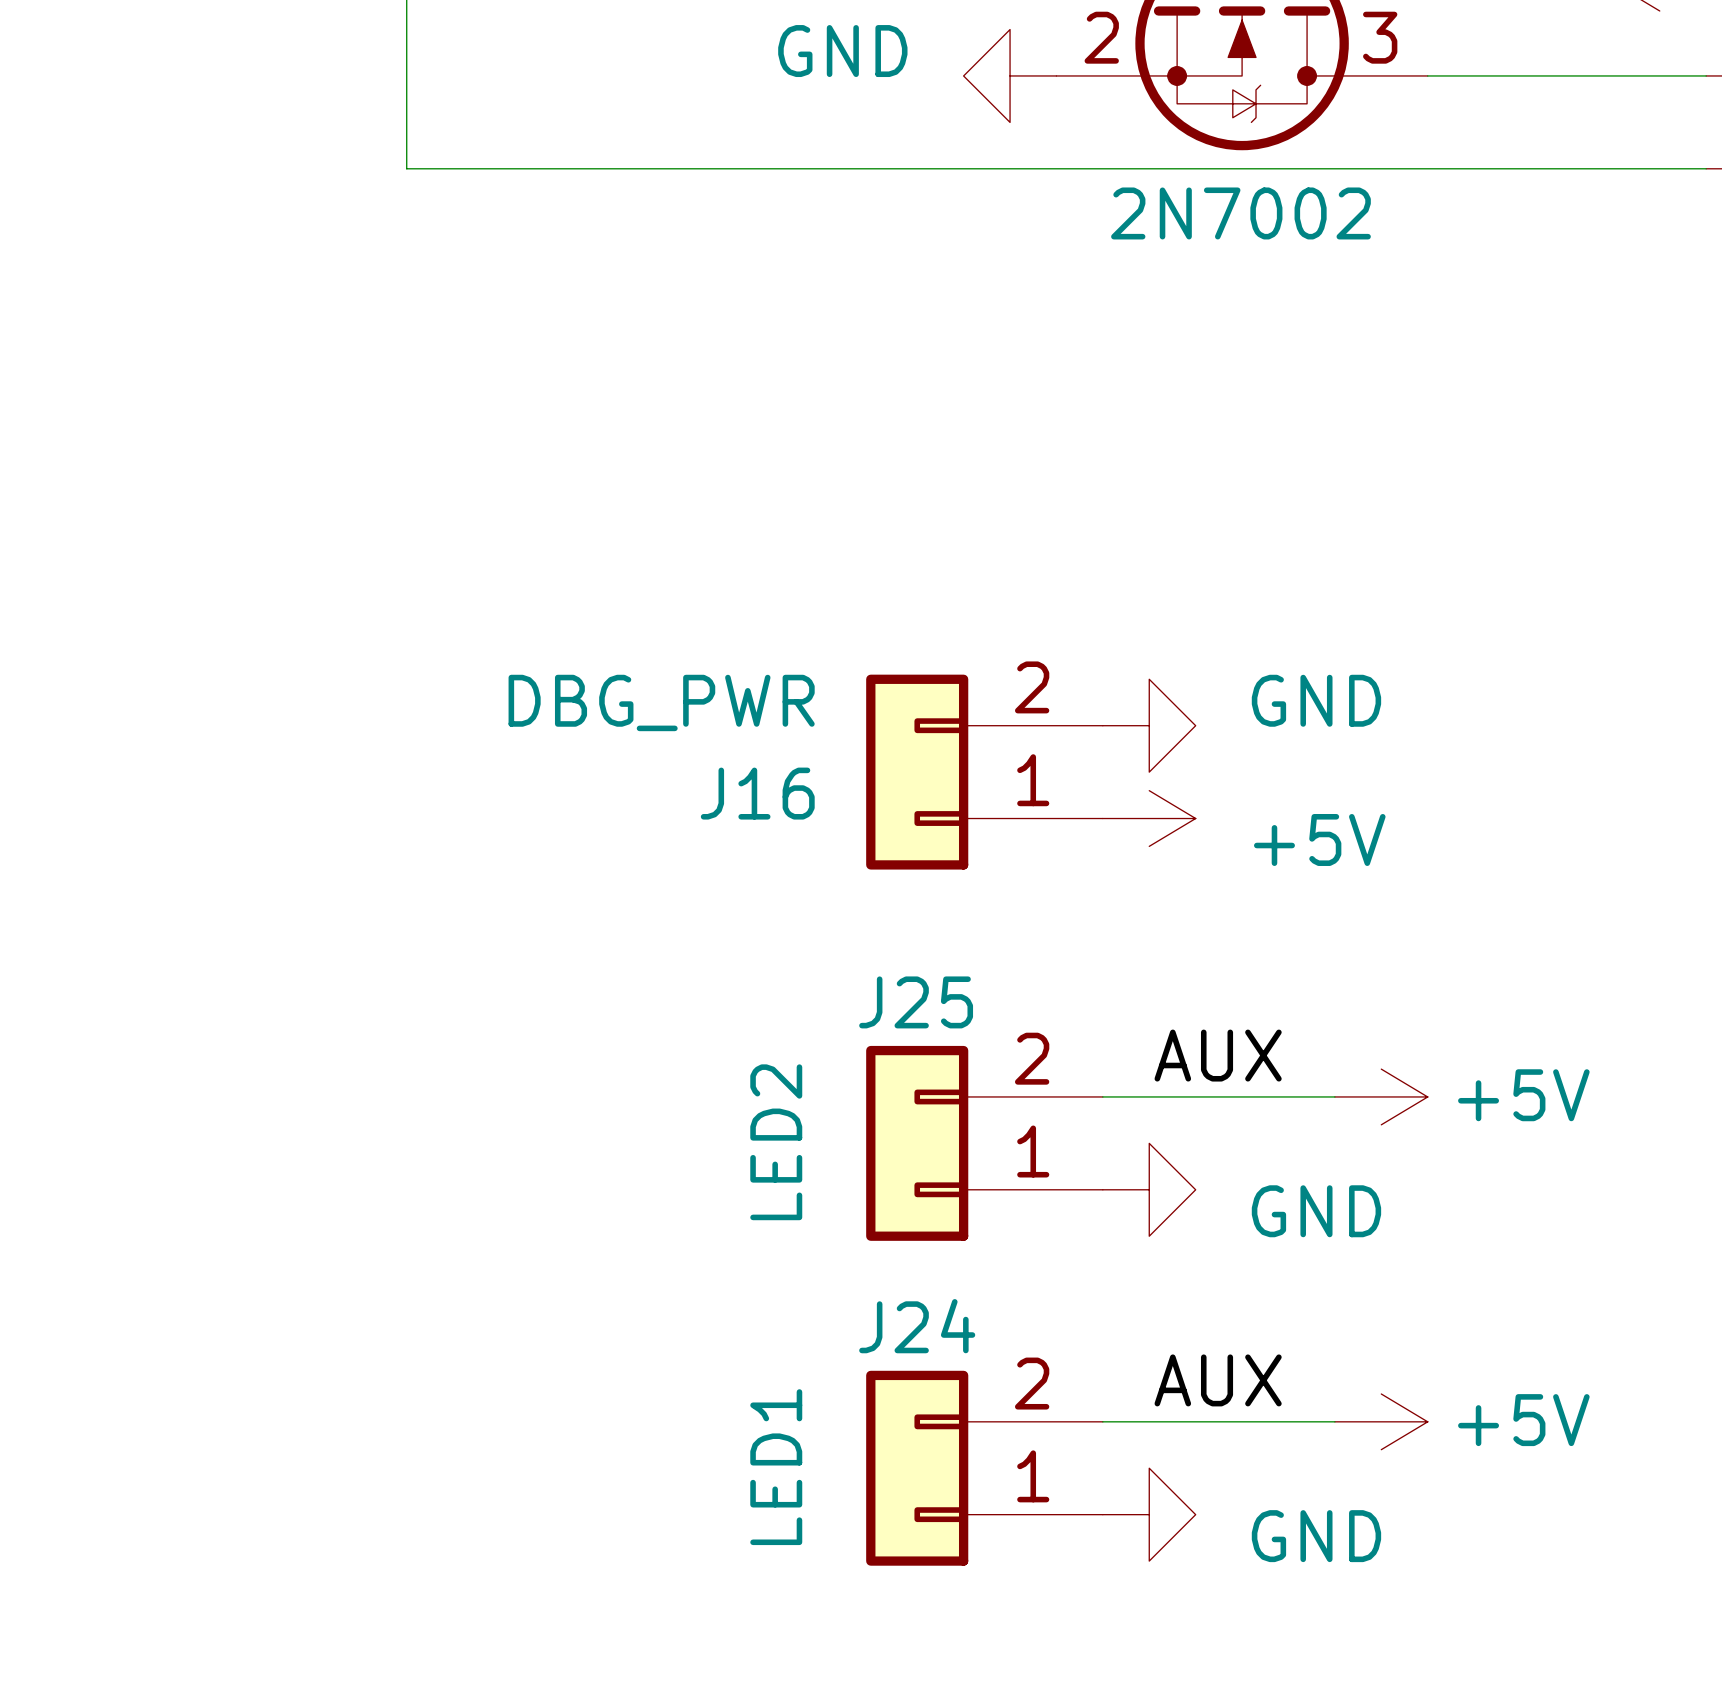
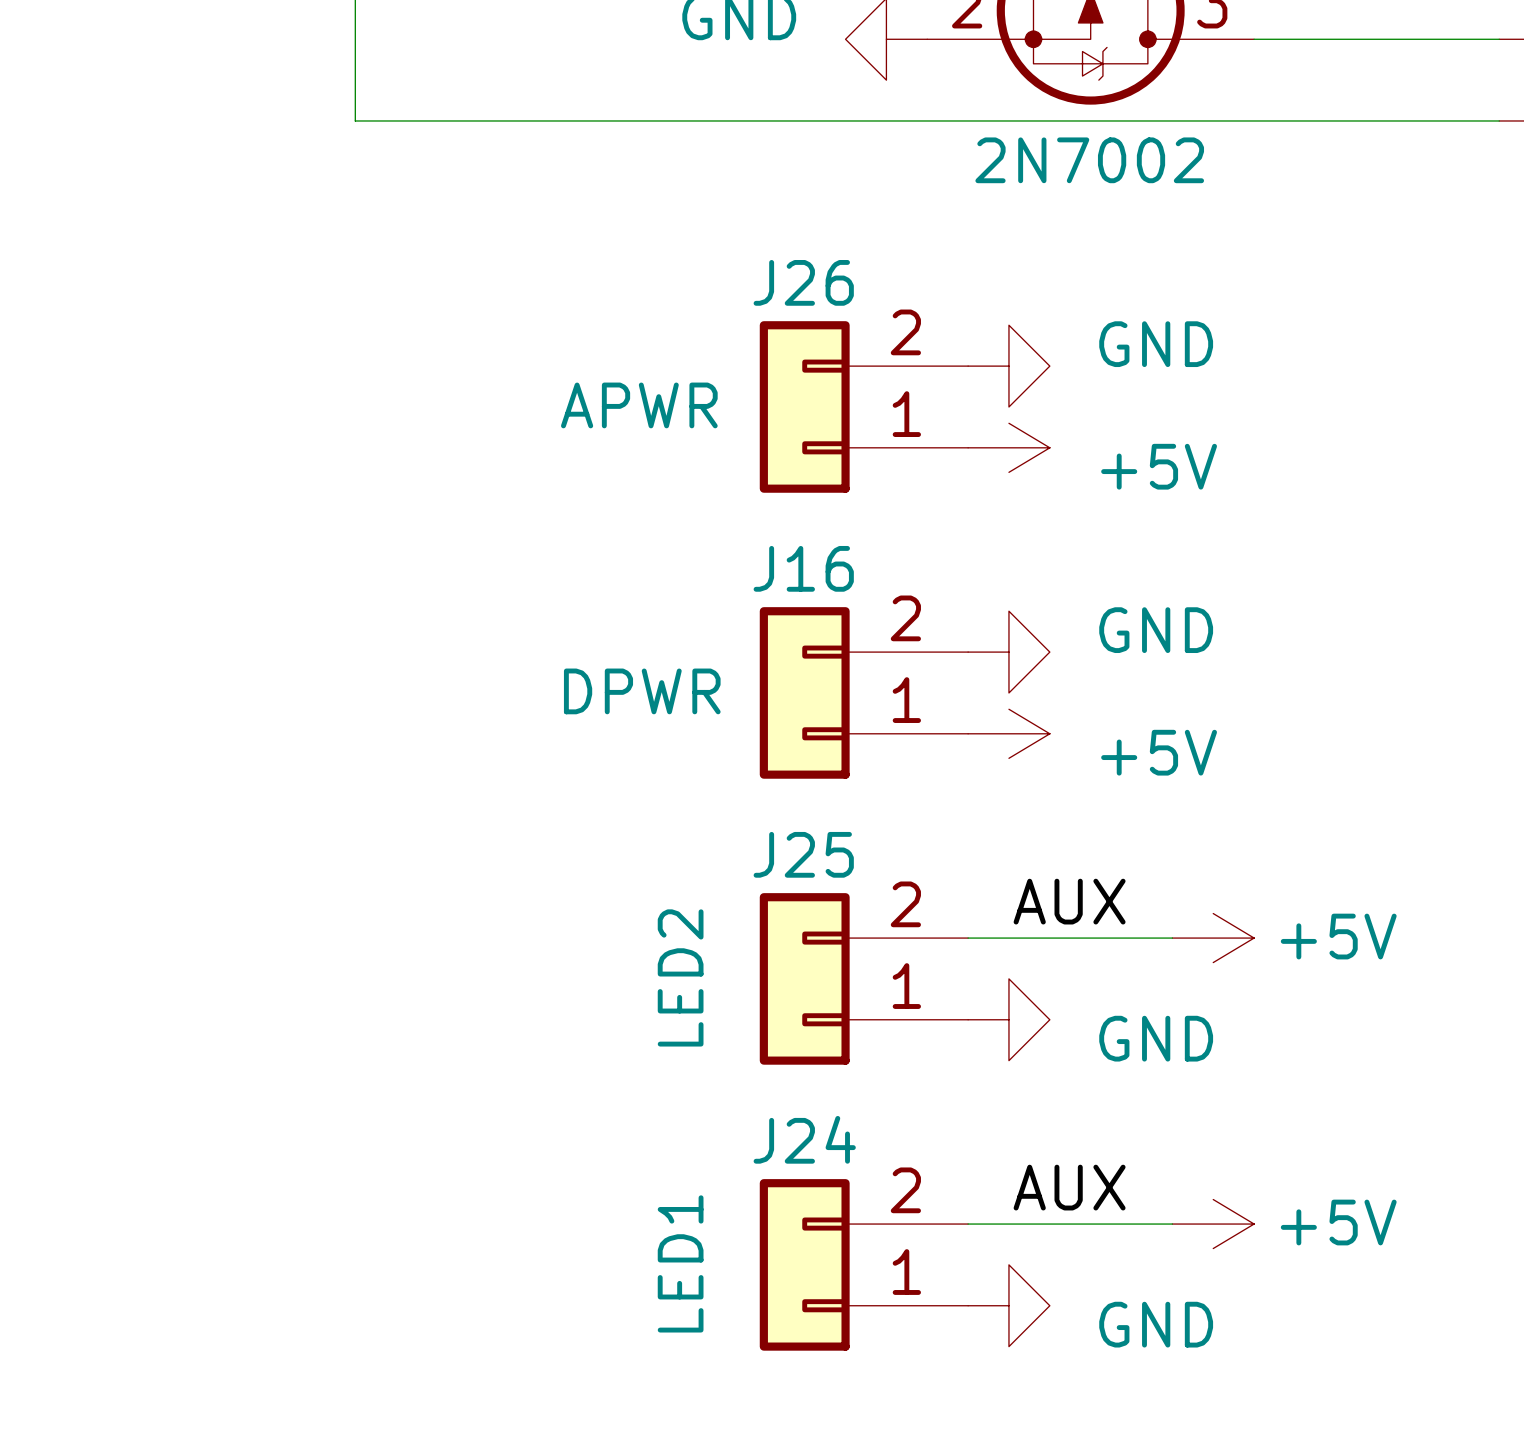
power symbol: none -> GND (1008, 366)
J26: none -> APWR (863, 406)
power symbol: none -> +5V (1008, 447)
J16 value: DBG_PWR (661, 702) -> DPWR (642, 691)
power symbol position: GND (1149, 725) -> GND (1008, 652)
J16 position: (984, 772) -> (863, 692)
J16 name position: J16 (757, 793) -> J16 (803, 568)
power symbol position: +5V (1149, 818) -> +5V (1008, 733)

